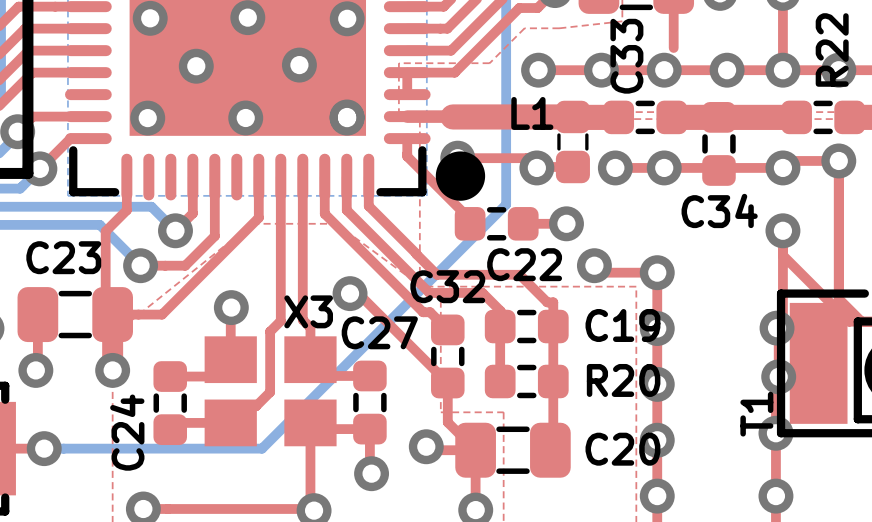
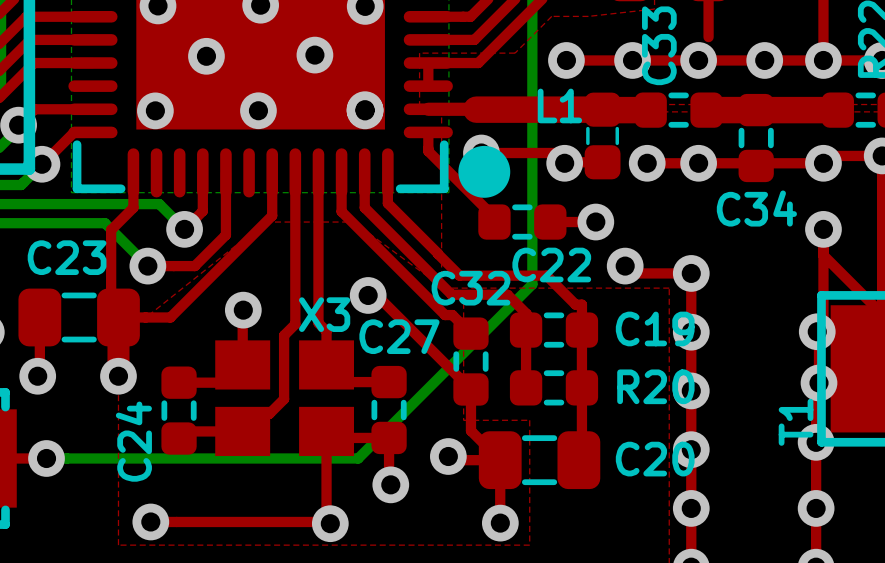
bottom track: (506, 204) (262, 448) -> (532, 201) (532, 284) (358, 458) (275, 458)

